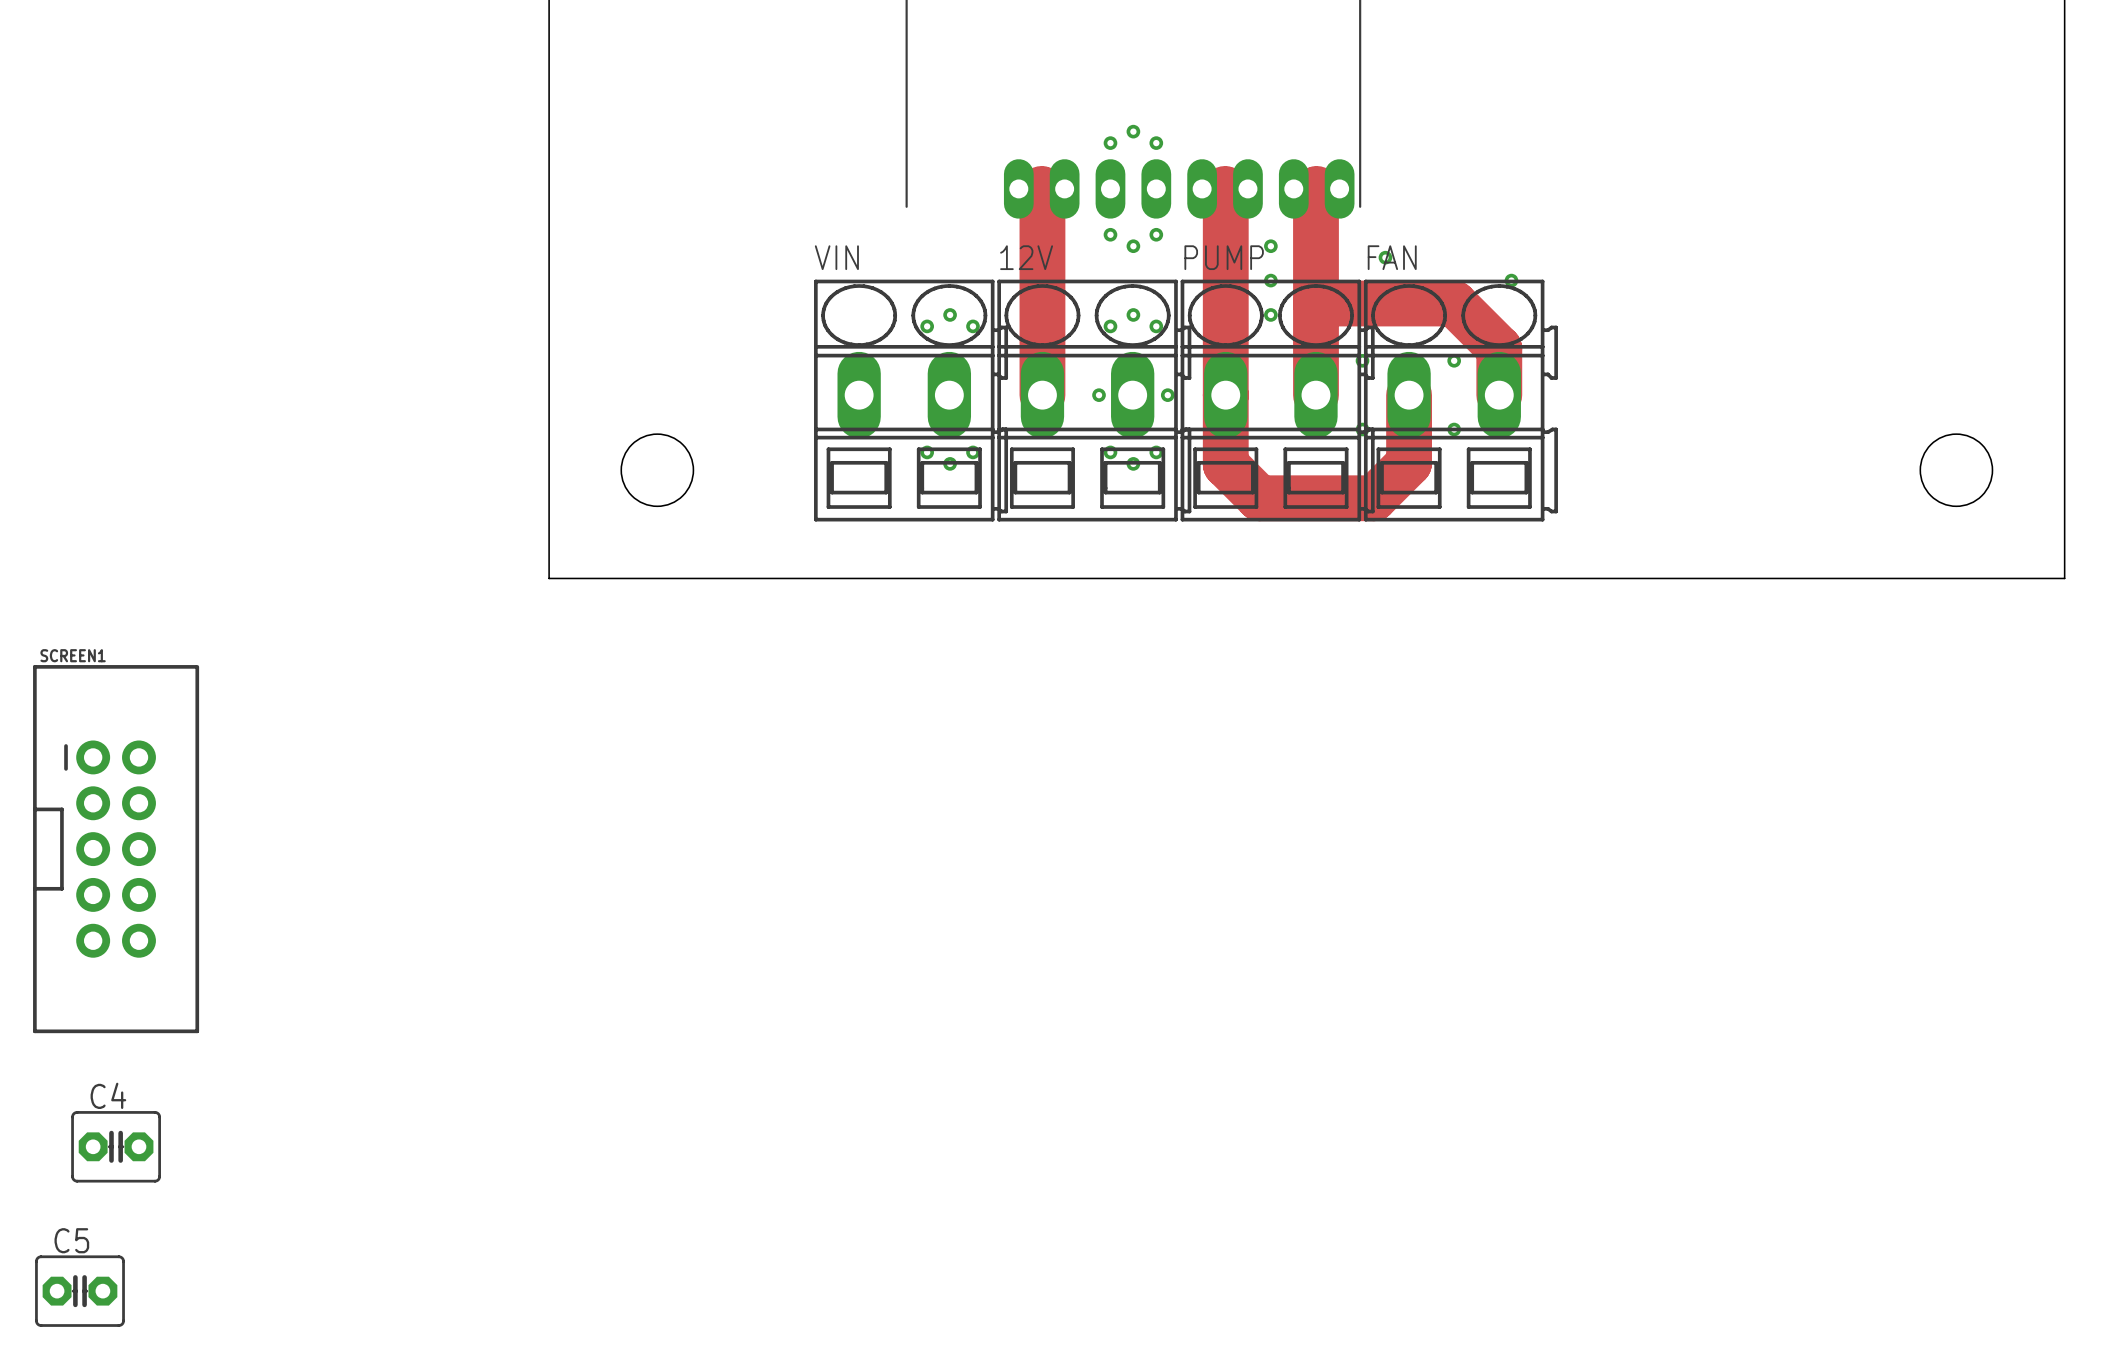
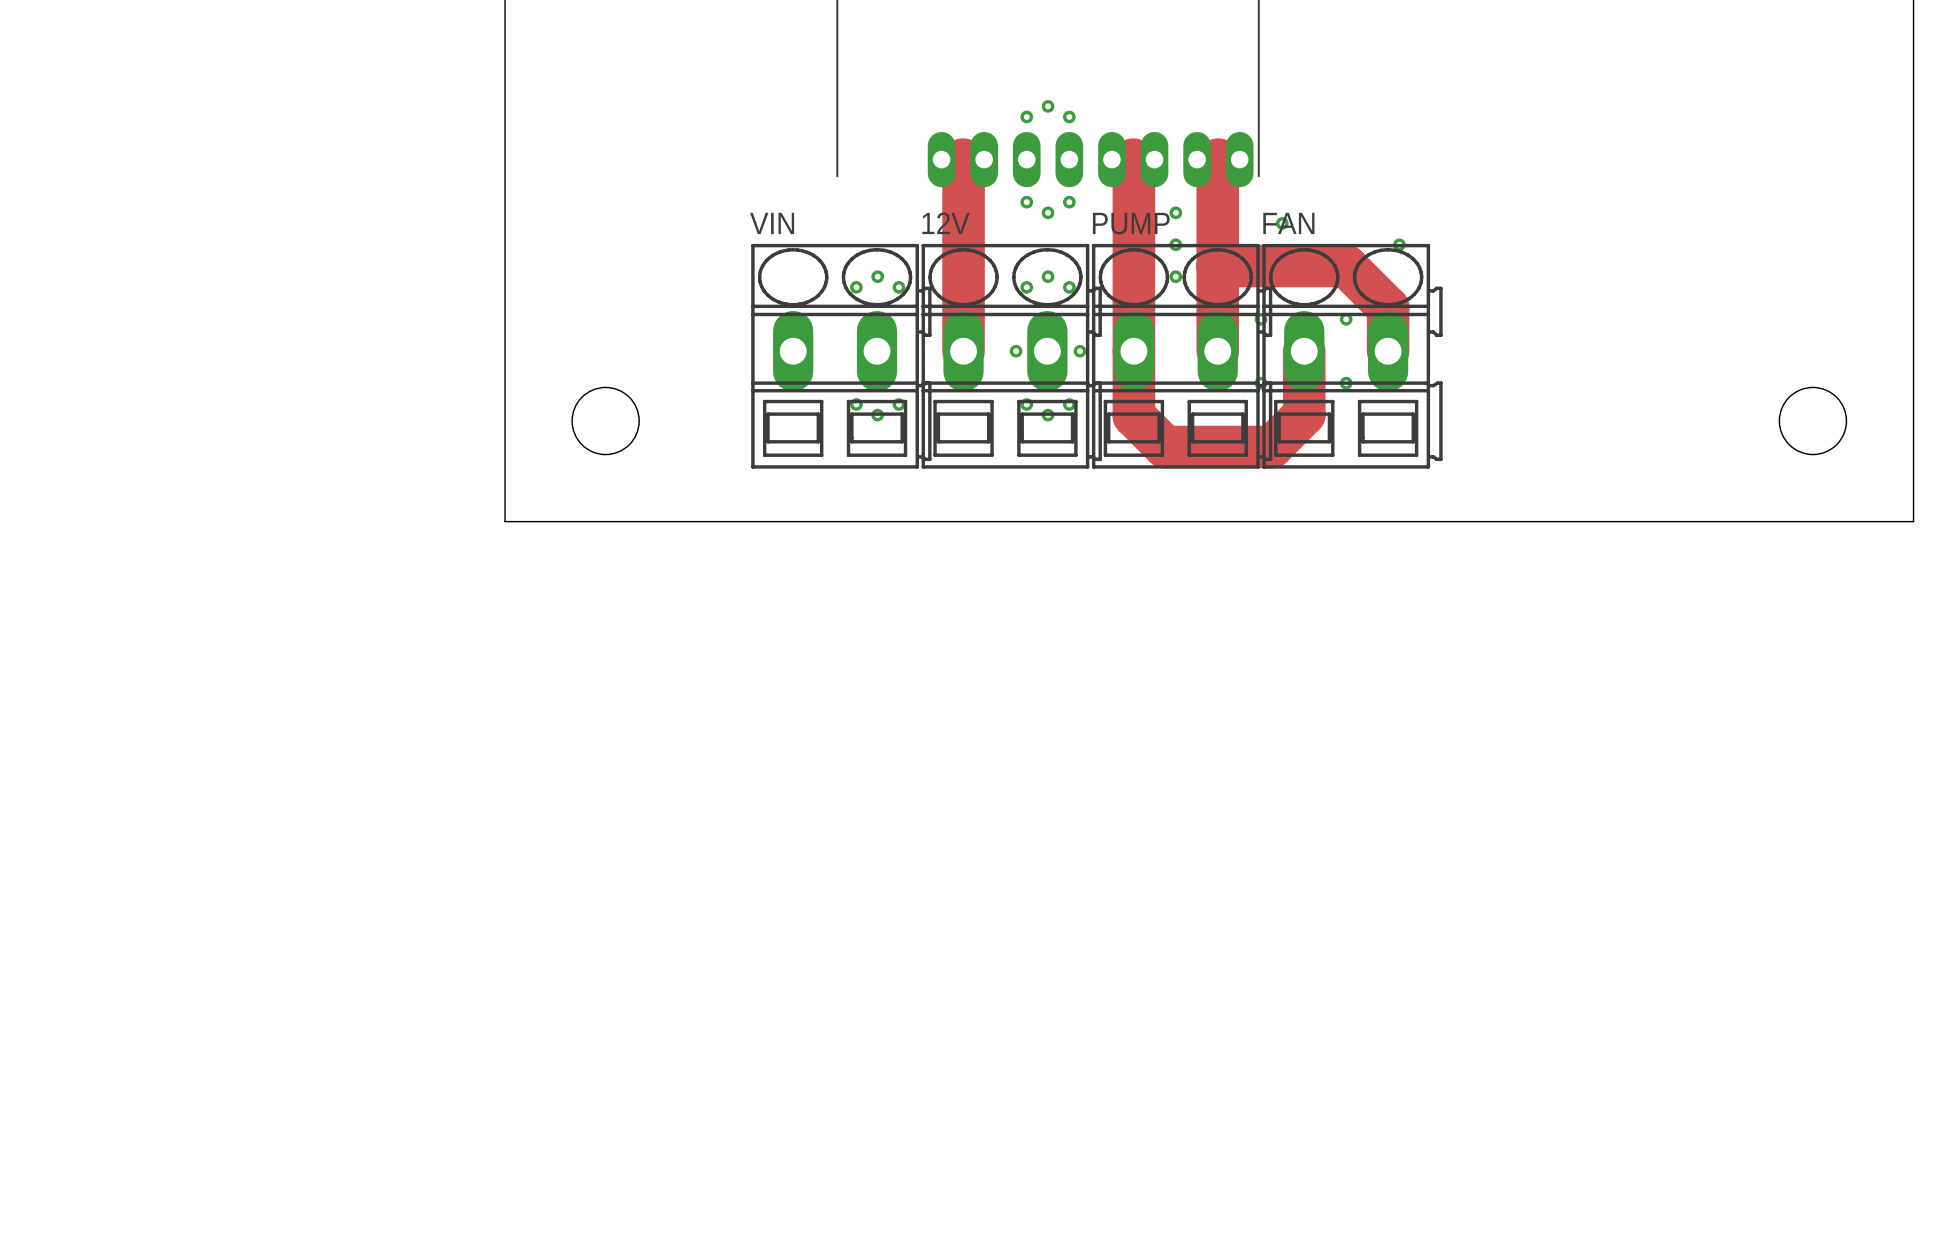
SCREEN1: (116, 849) -> none
C4: (116, 1146) -> none
C5: (79, 1291) -> none

